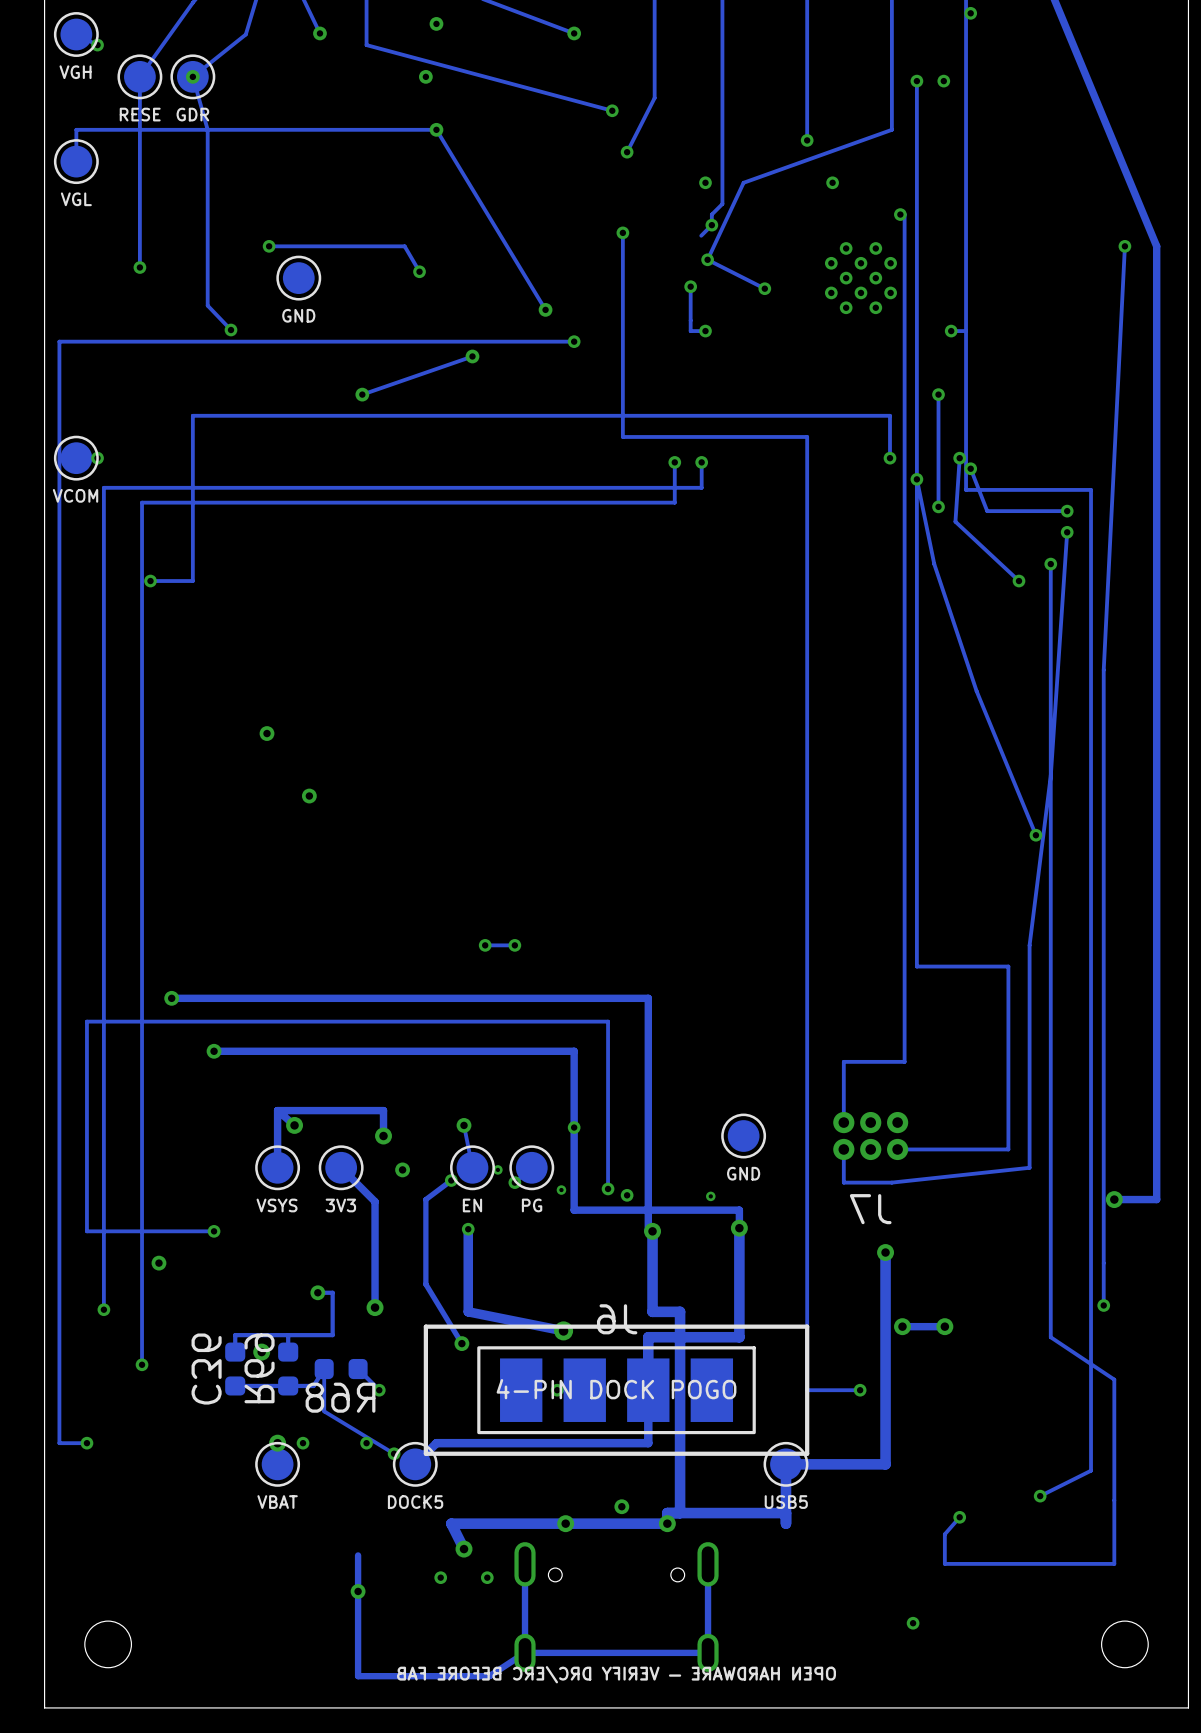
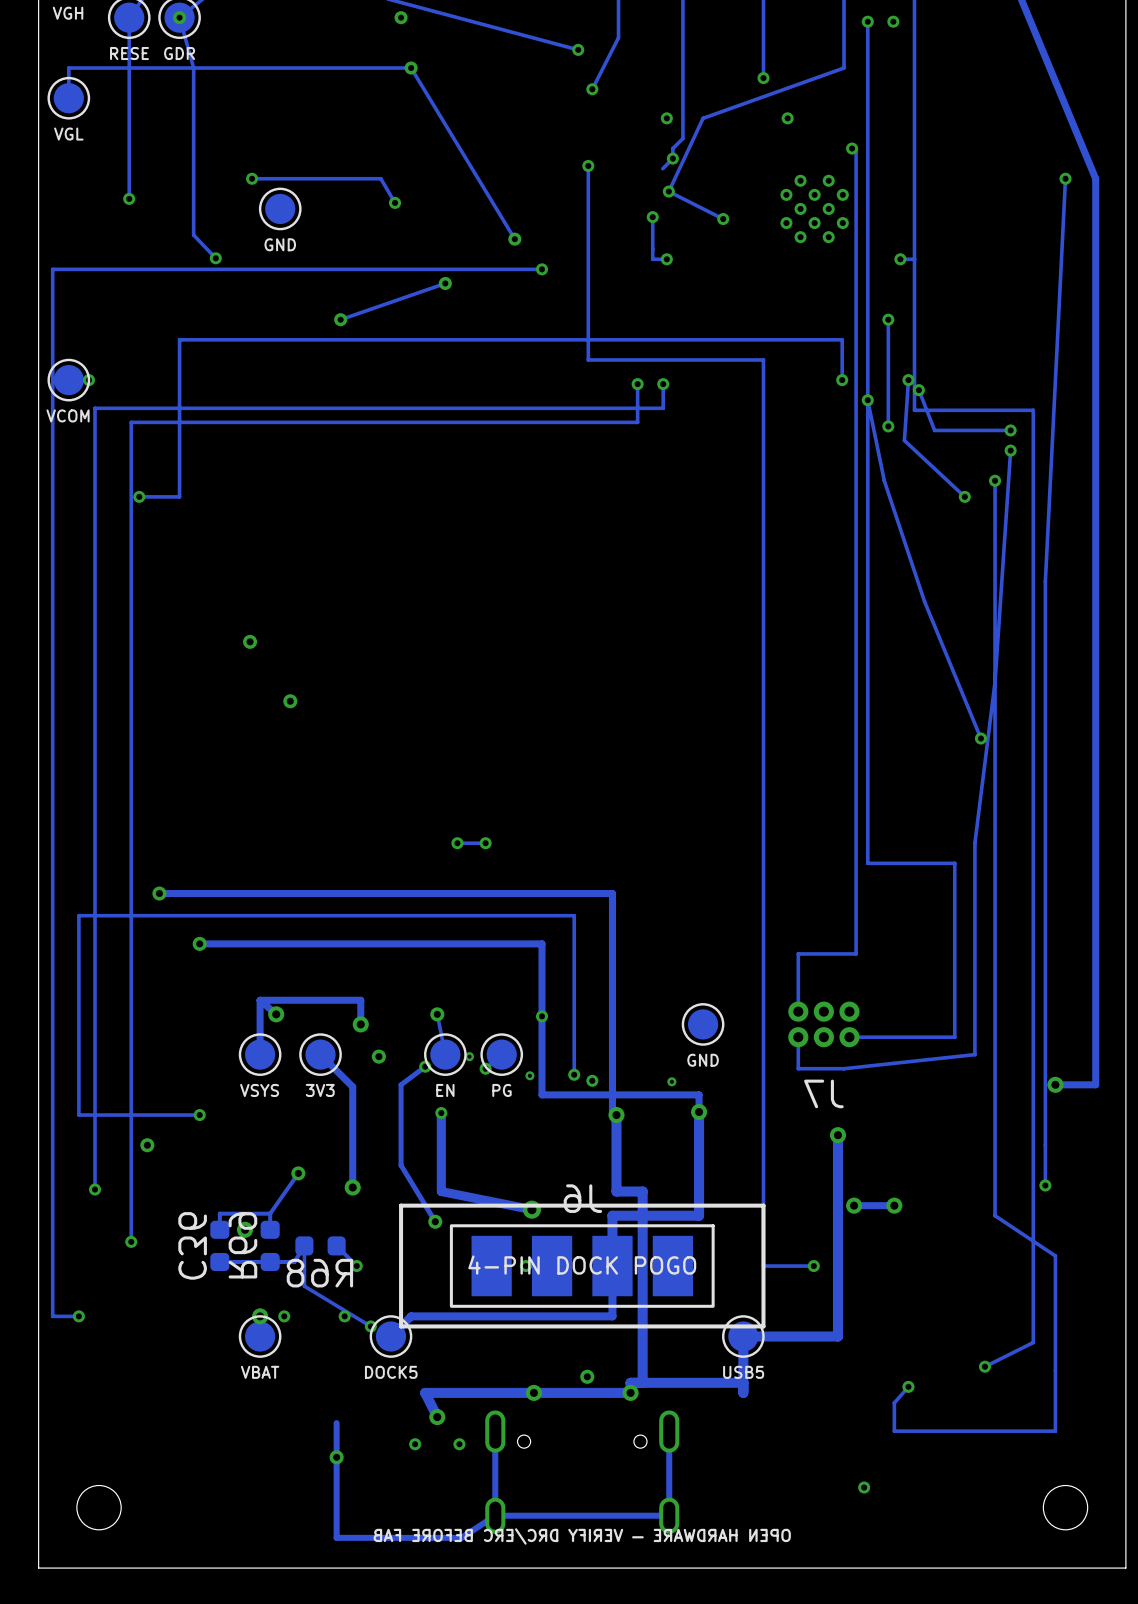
track: (317, 1292) (332, 1292) (332, 1335) (288, 1335) -> (298, 1173) (270, 1213)

